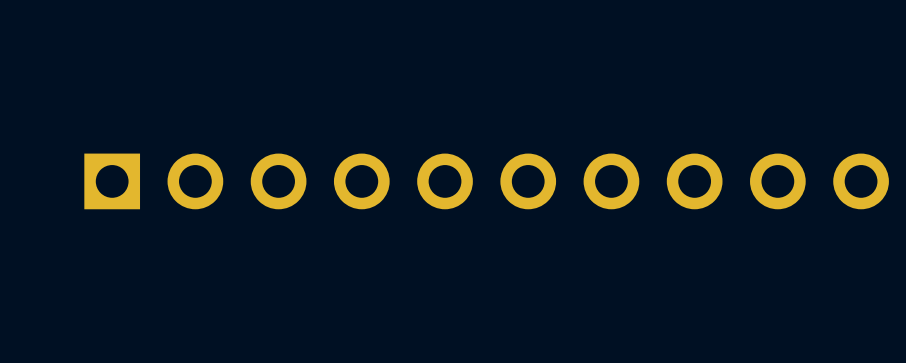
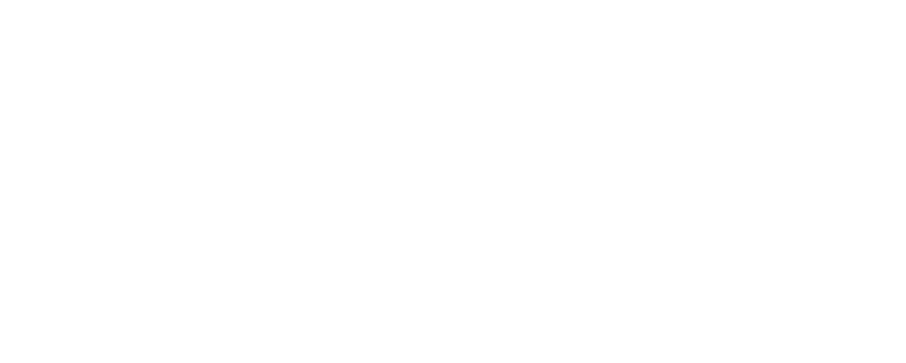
part: (486, 181) -> none

